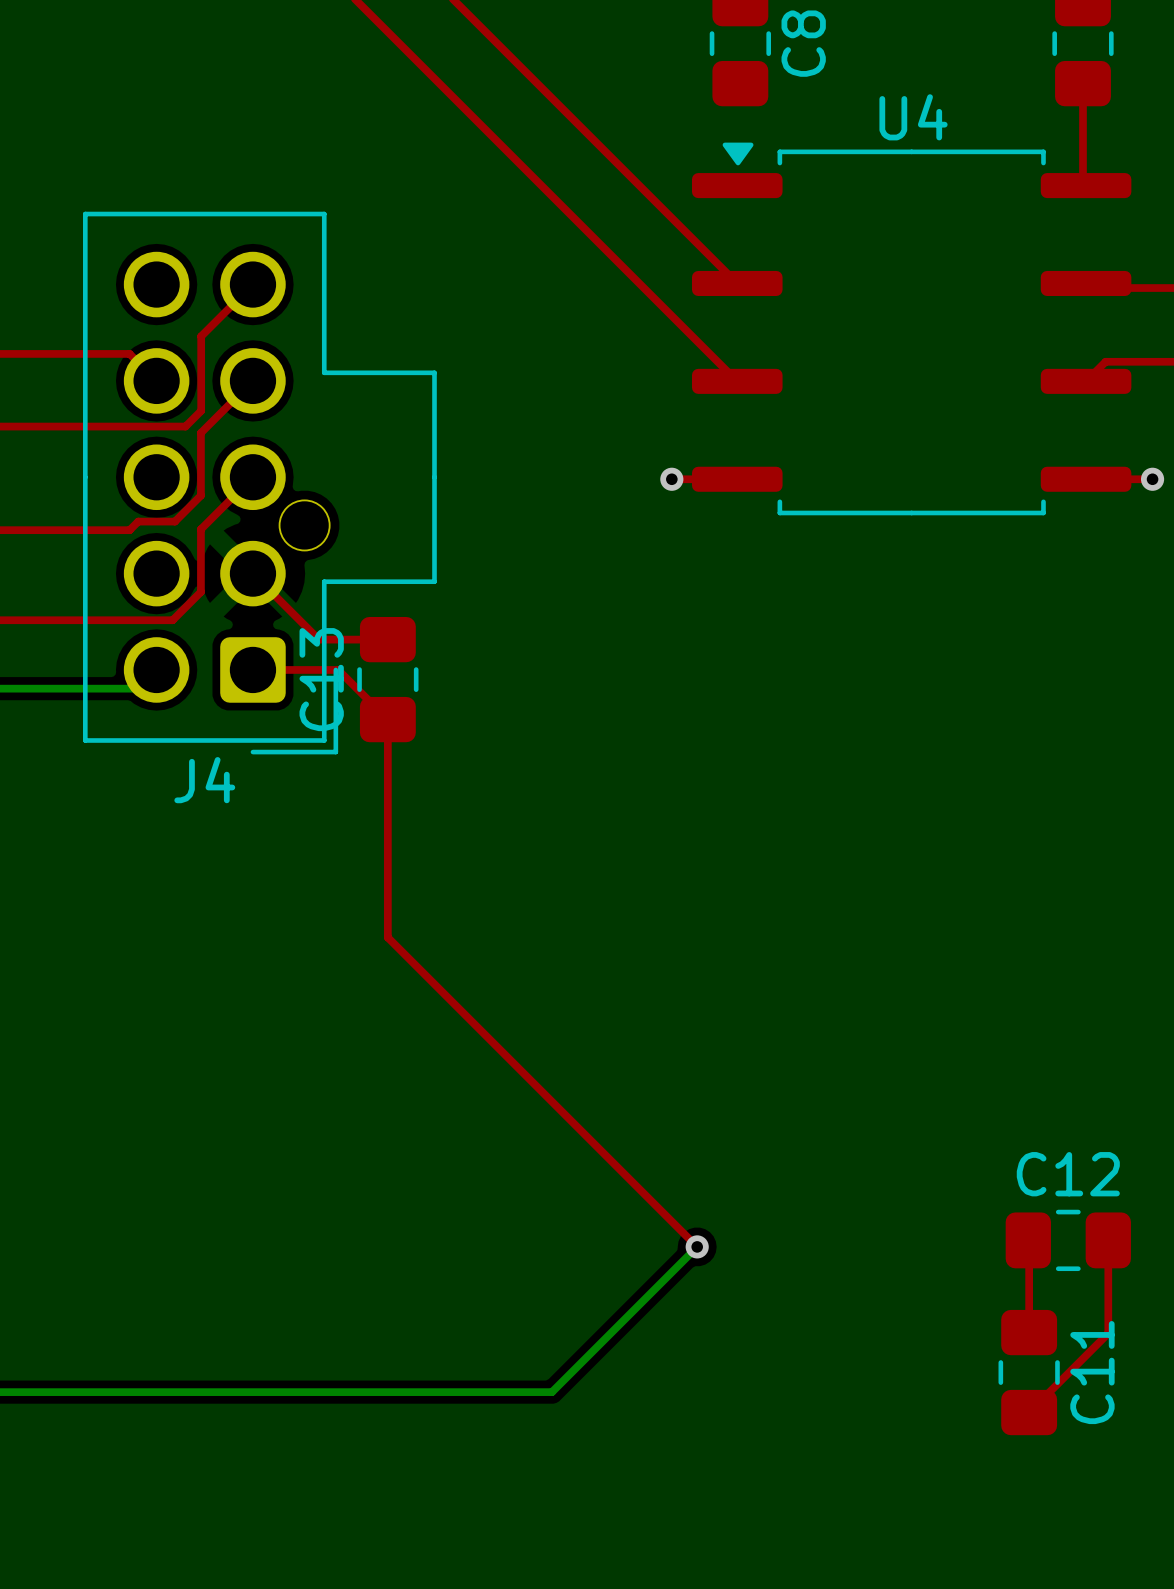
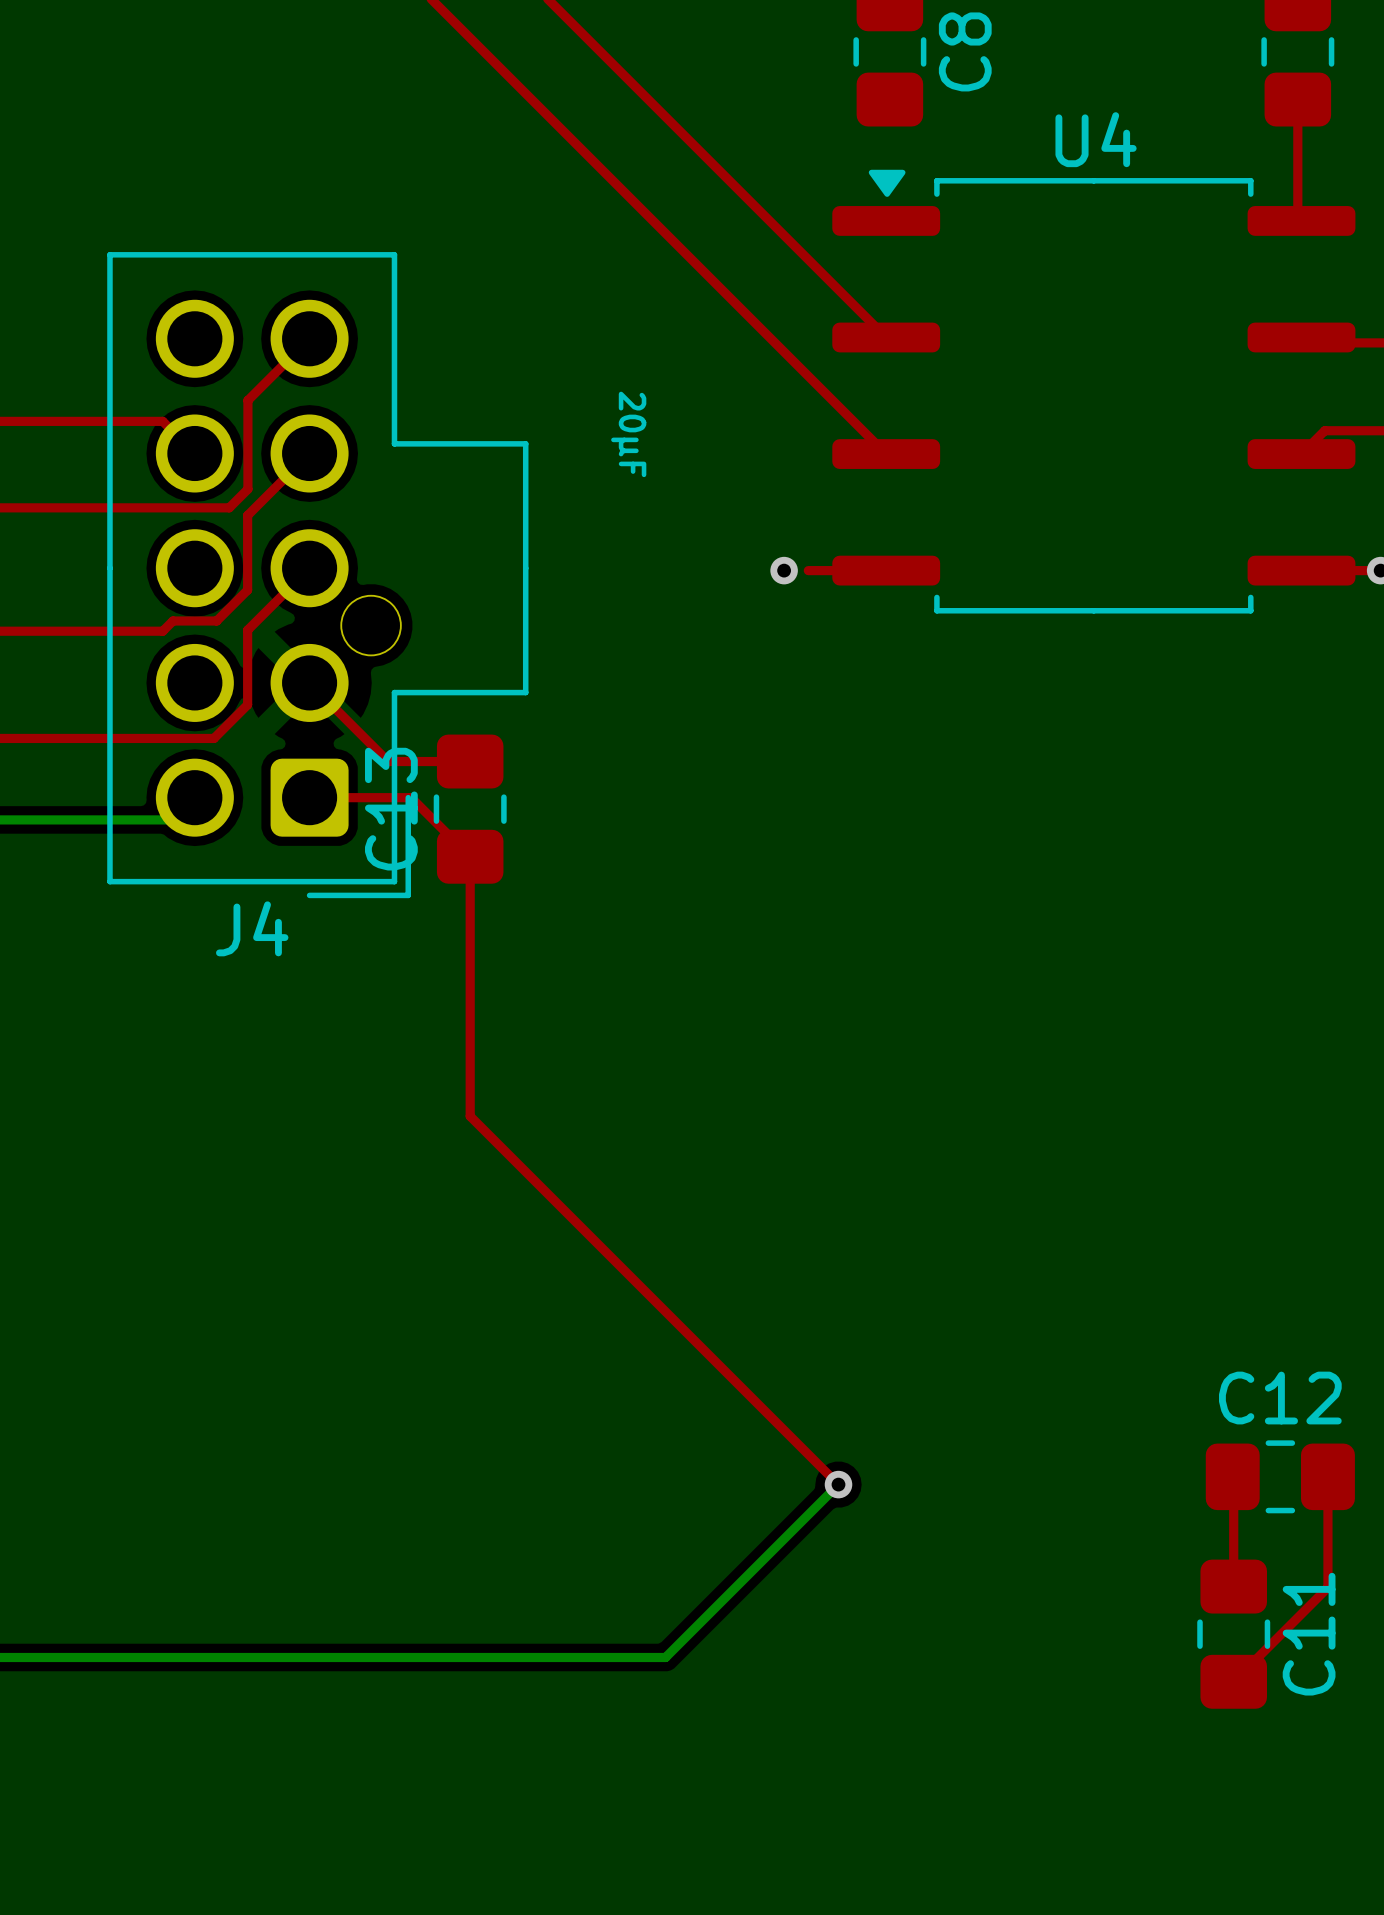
text: none -> 20μF (628, 434)
via position: (671, 479) -> (784, 570)

